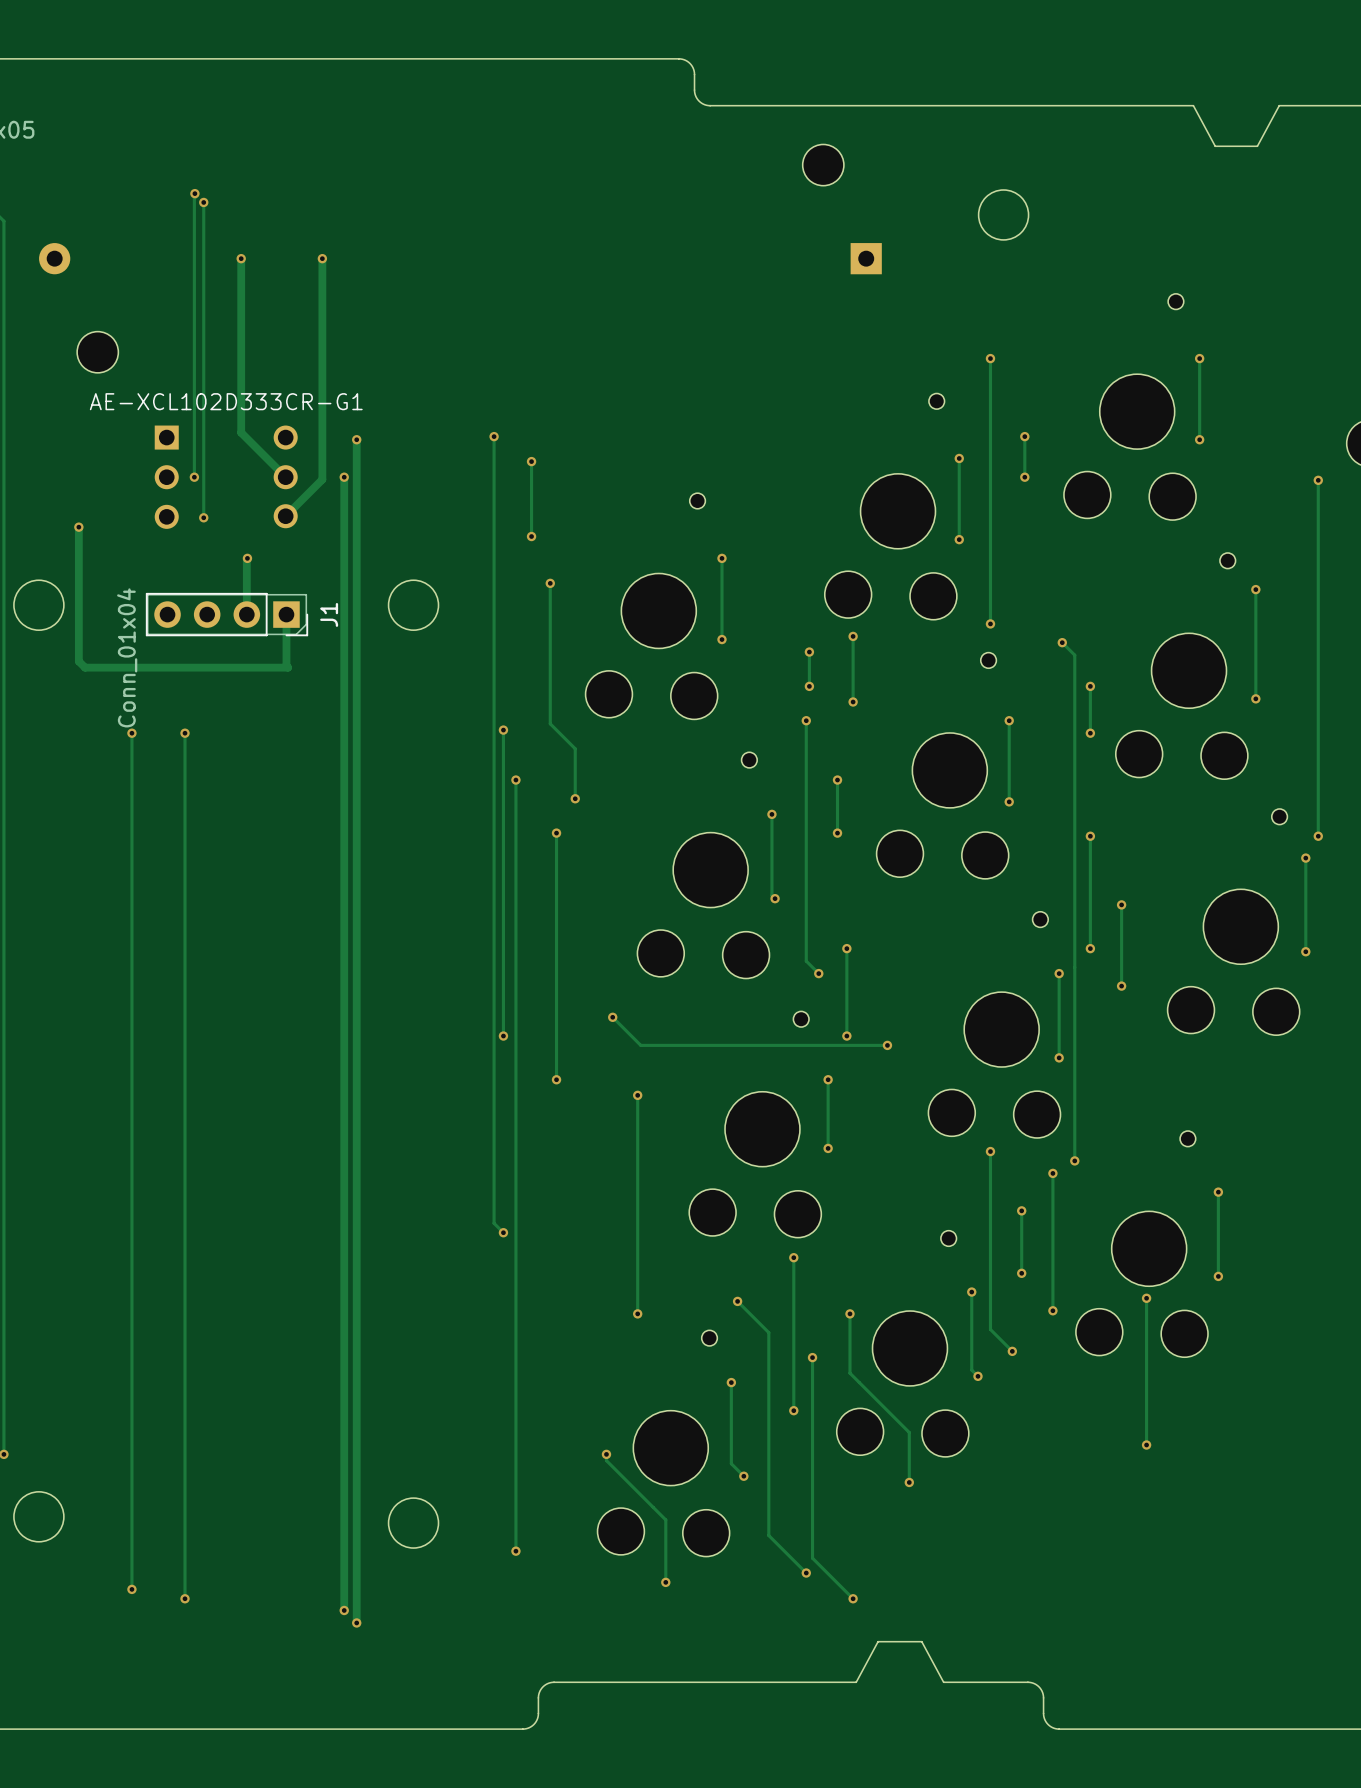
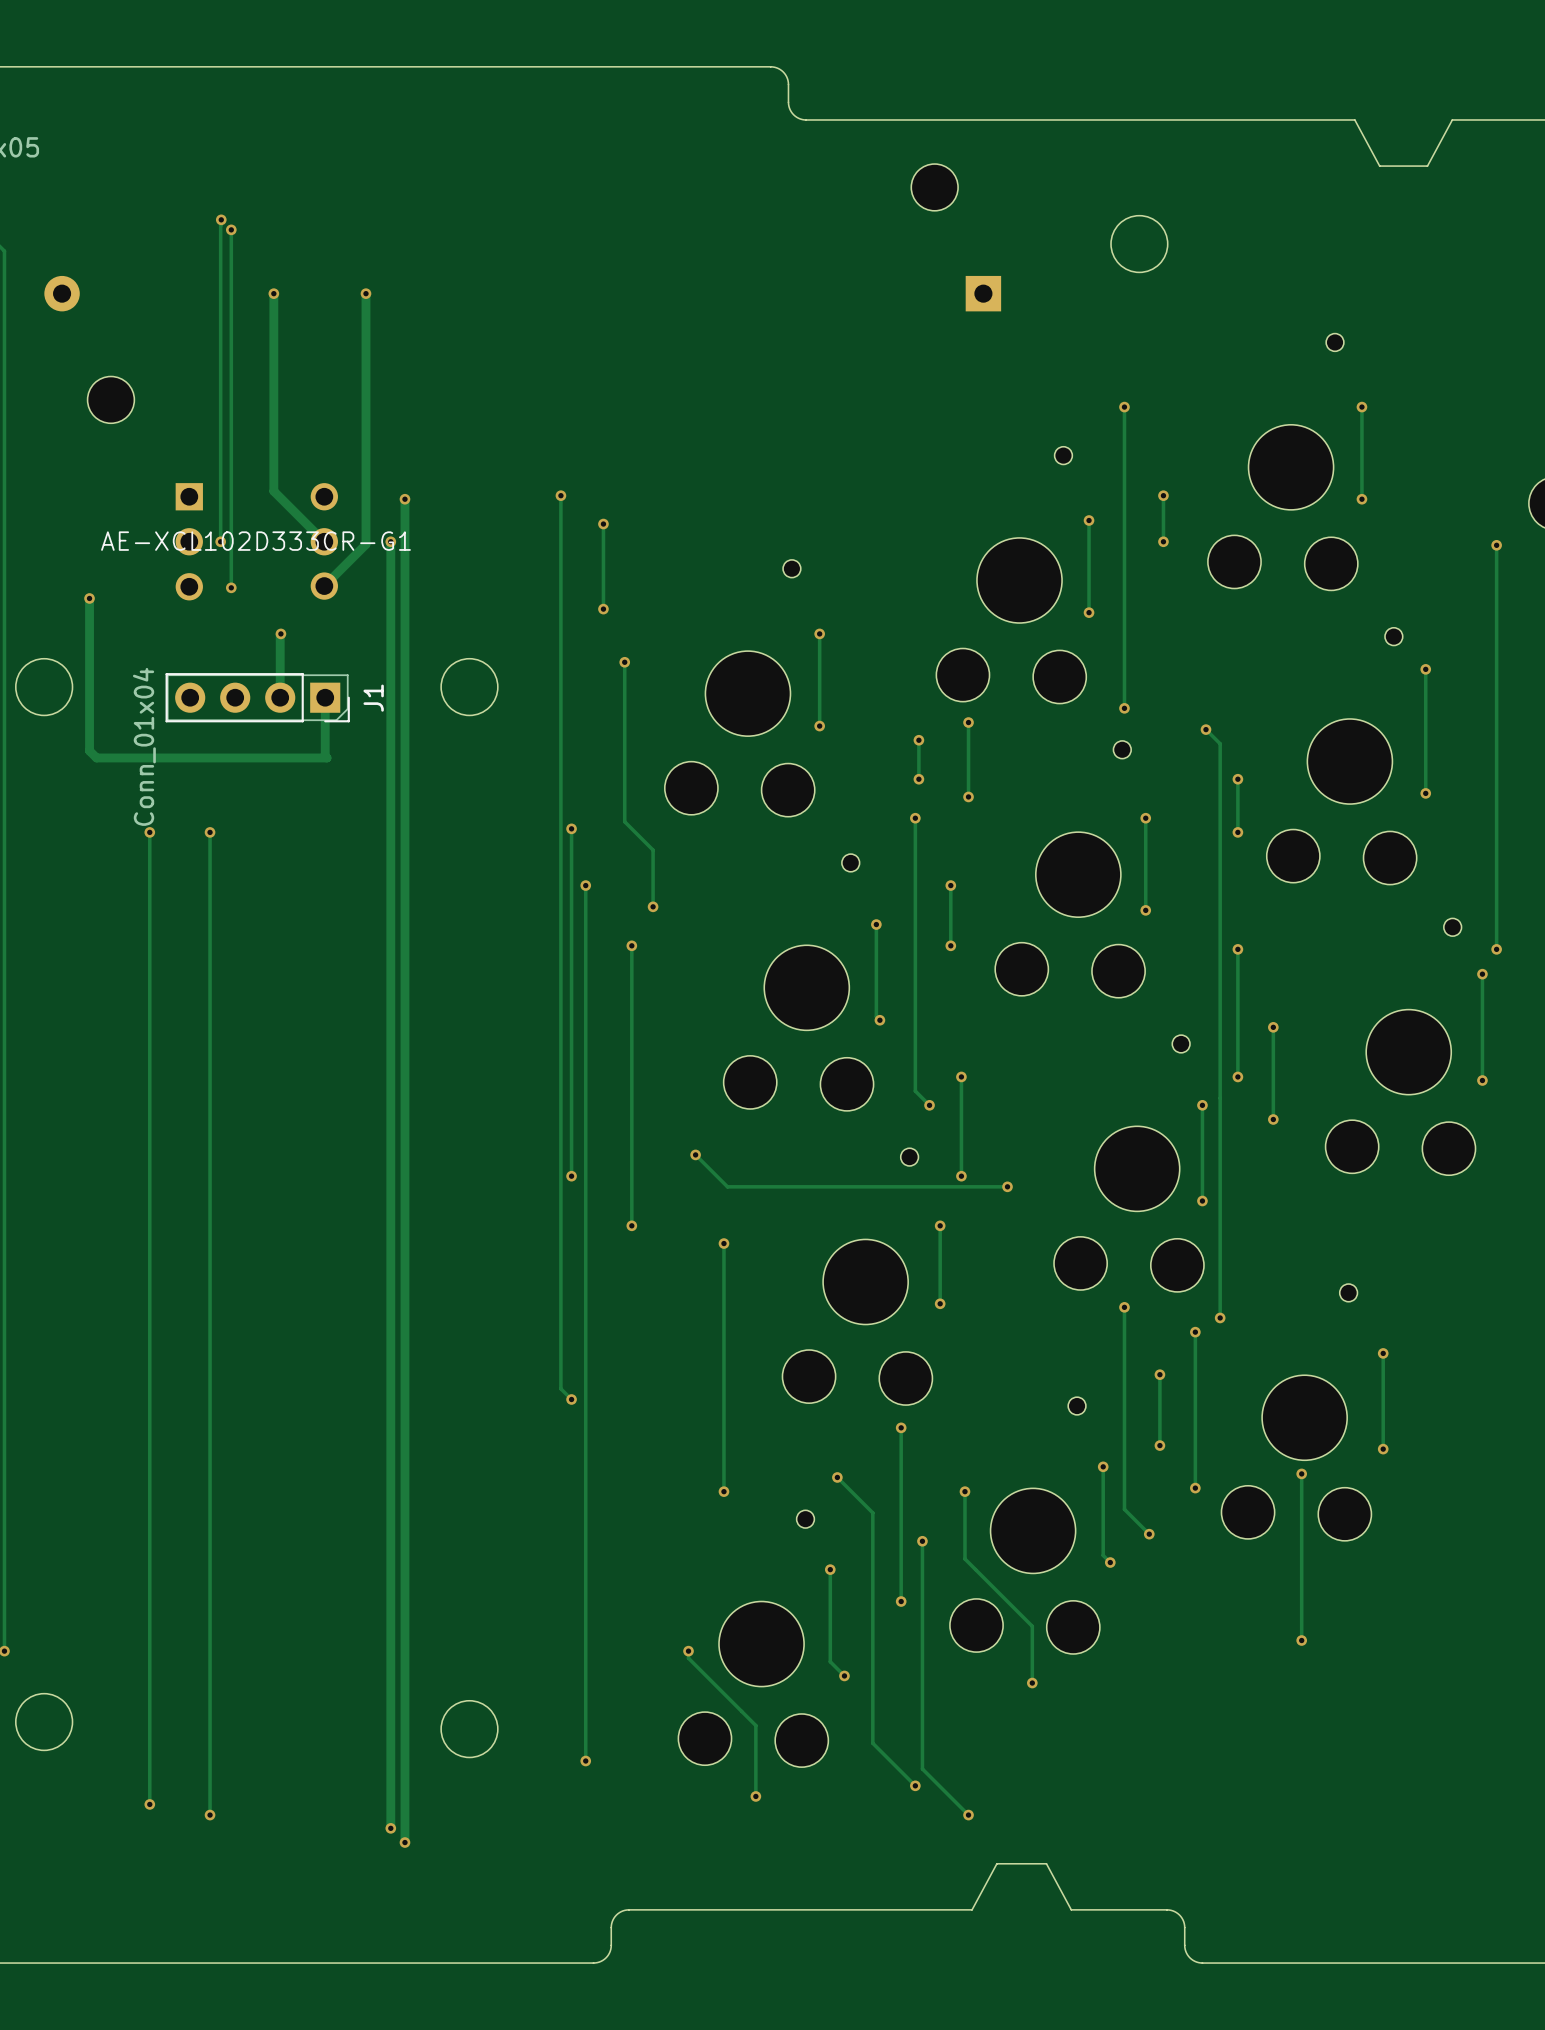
AE-XCL102D333CR-G1 name position: AE-XCL102D333CR-G1 (226, 401) -> AE-XCL102D333CR-G1 (255, 541)

